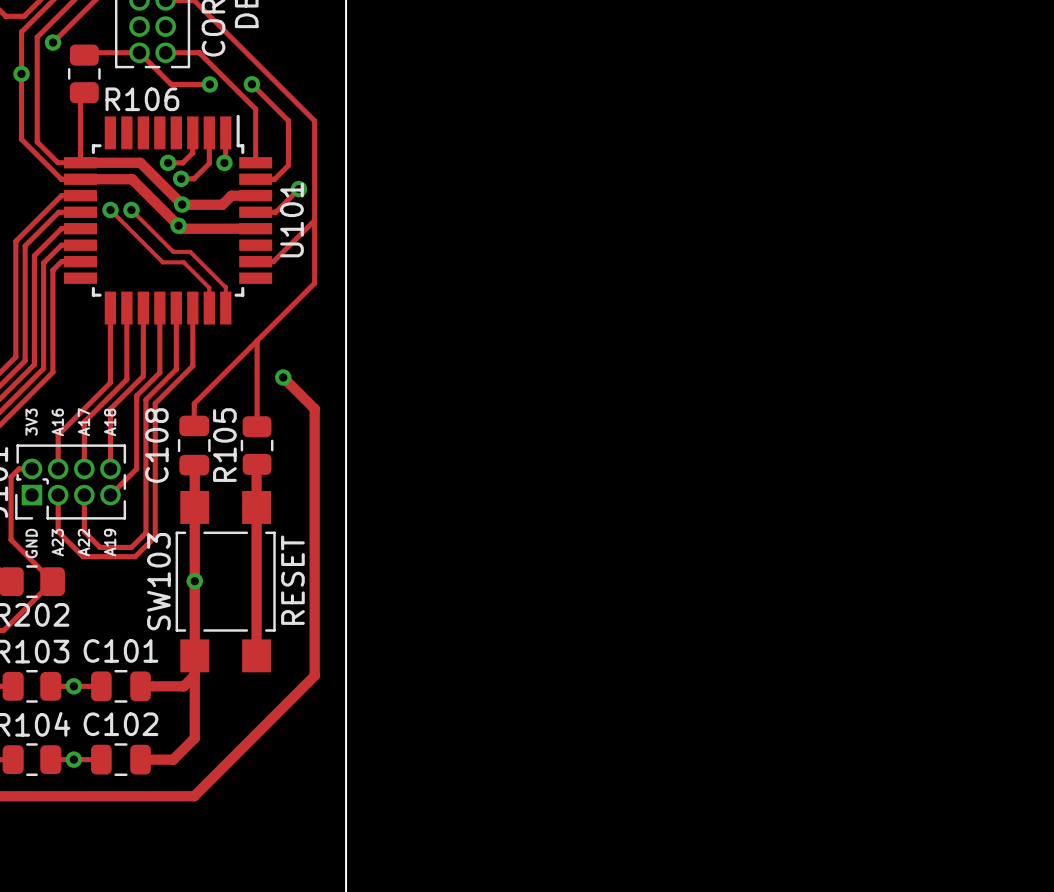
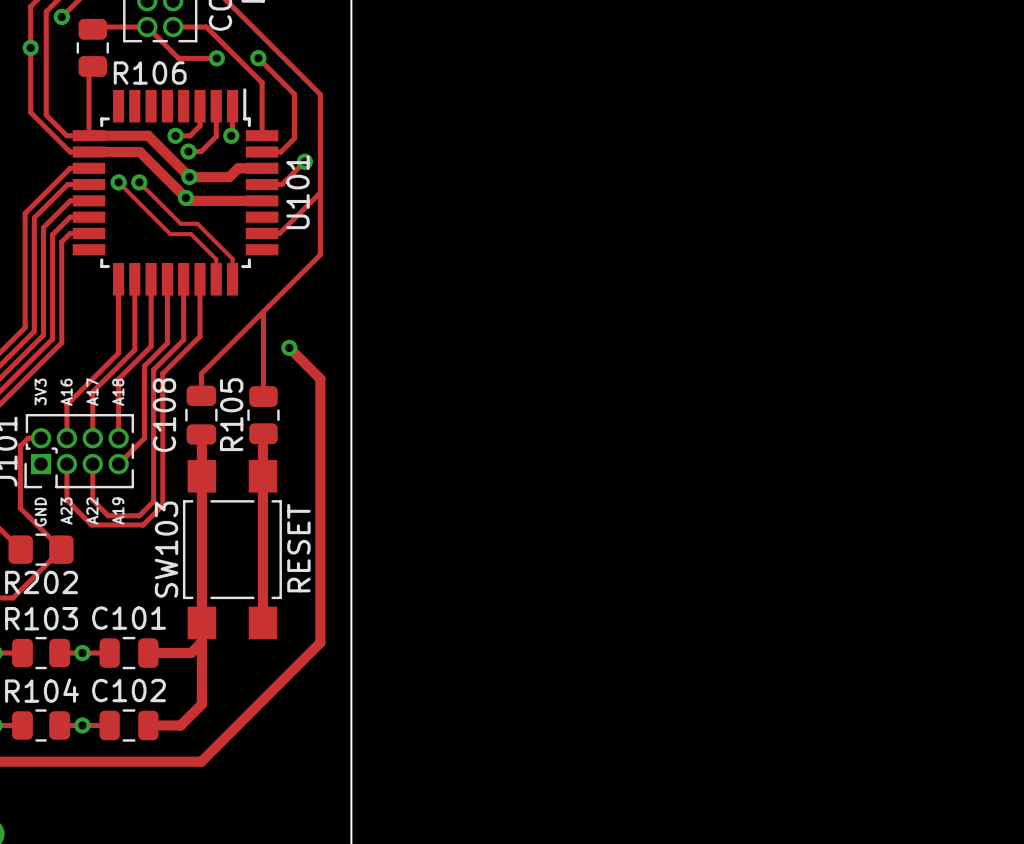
via: (194, 581) -> none

